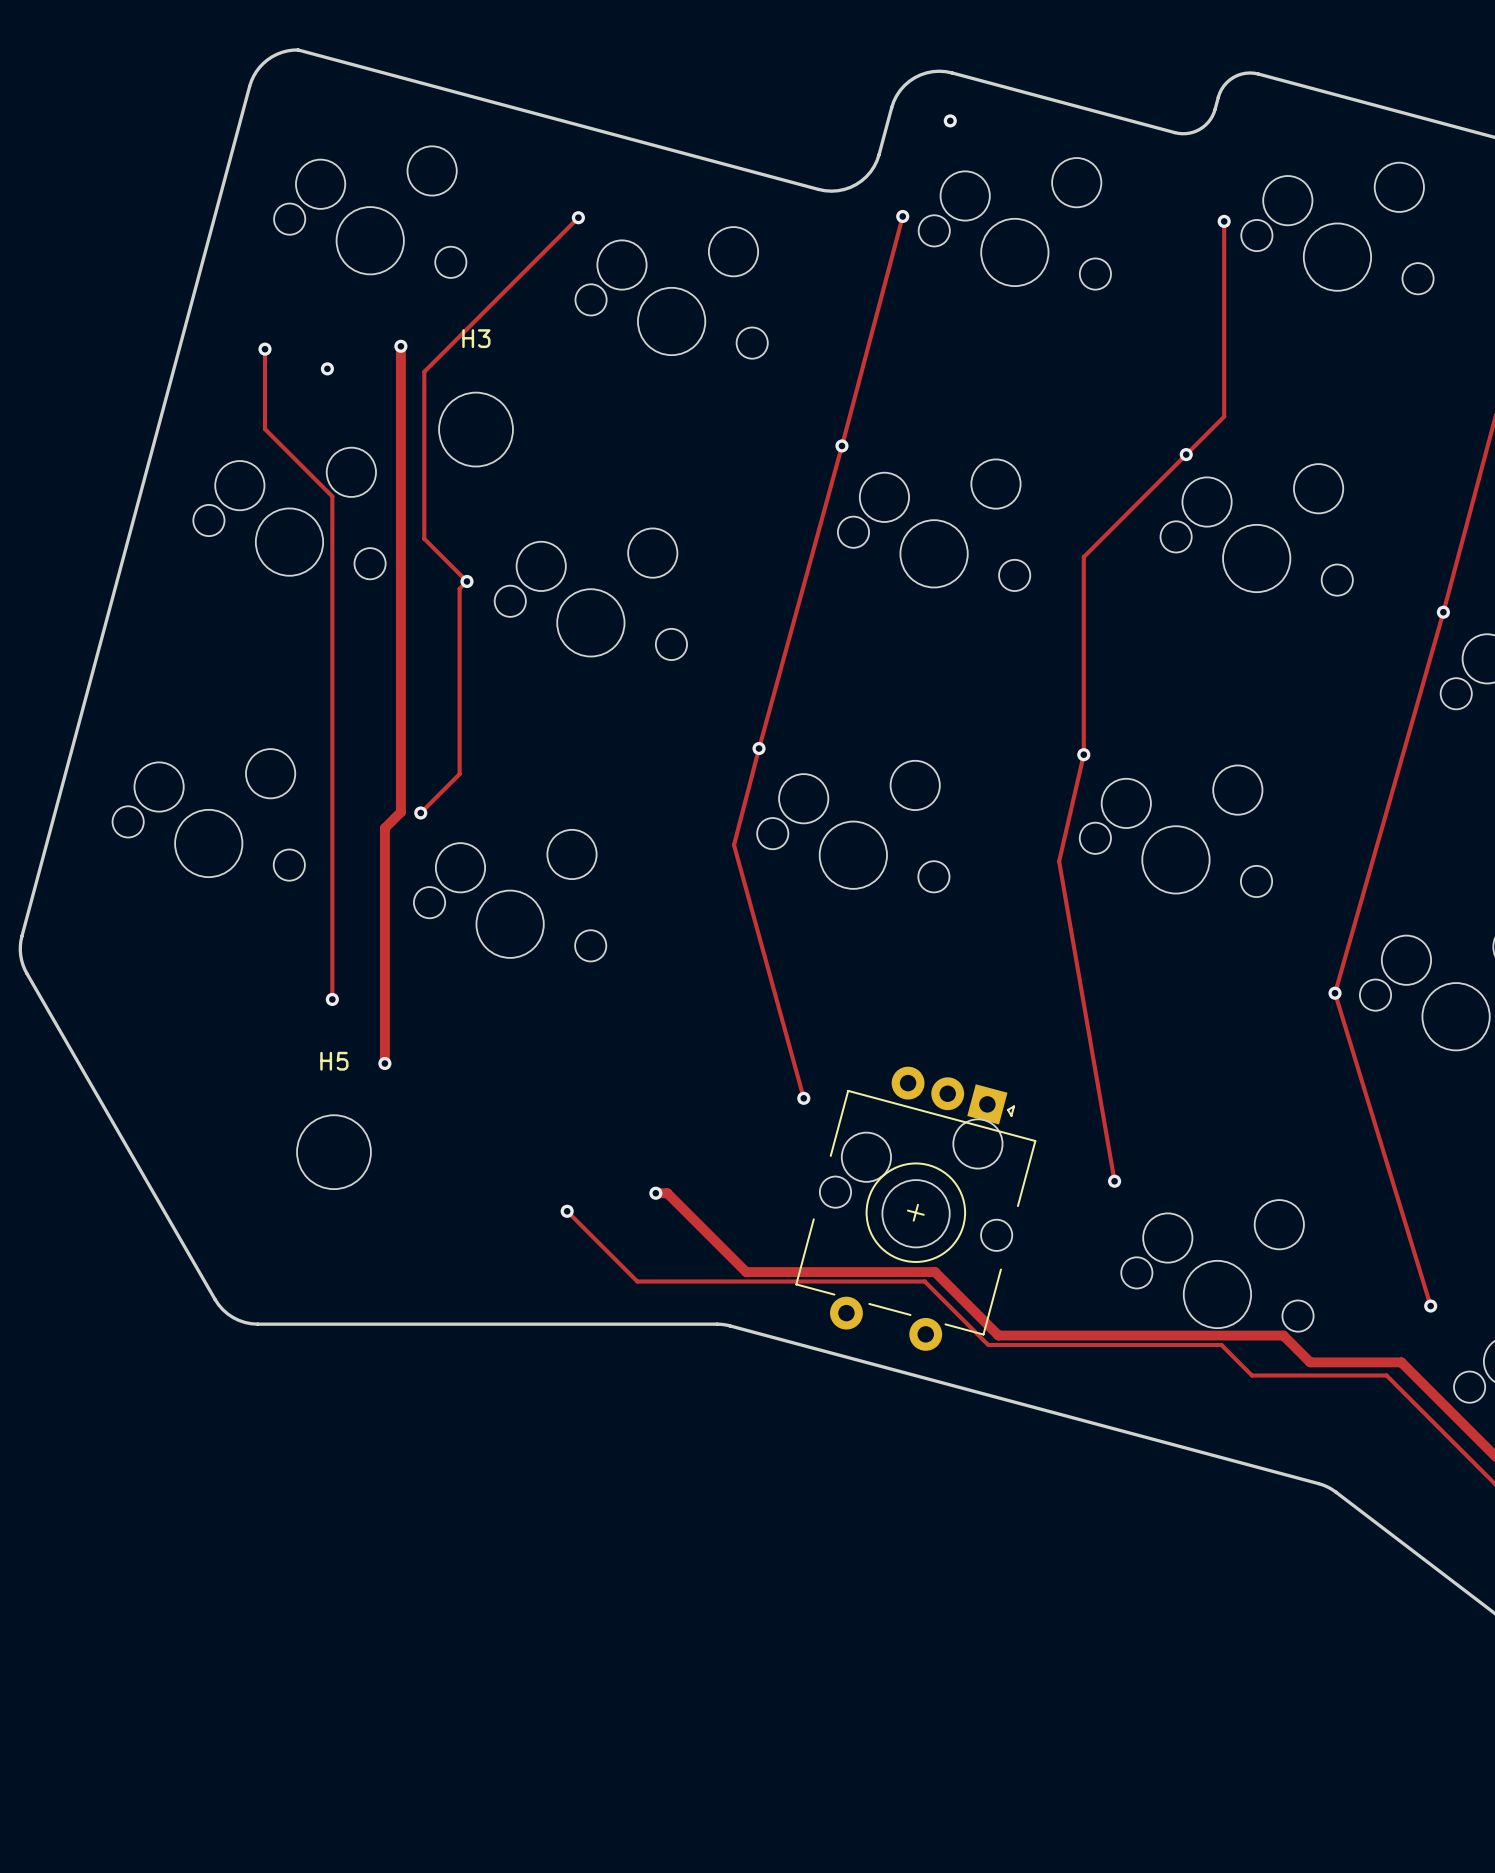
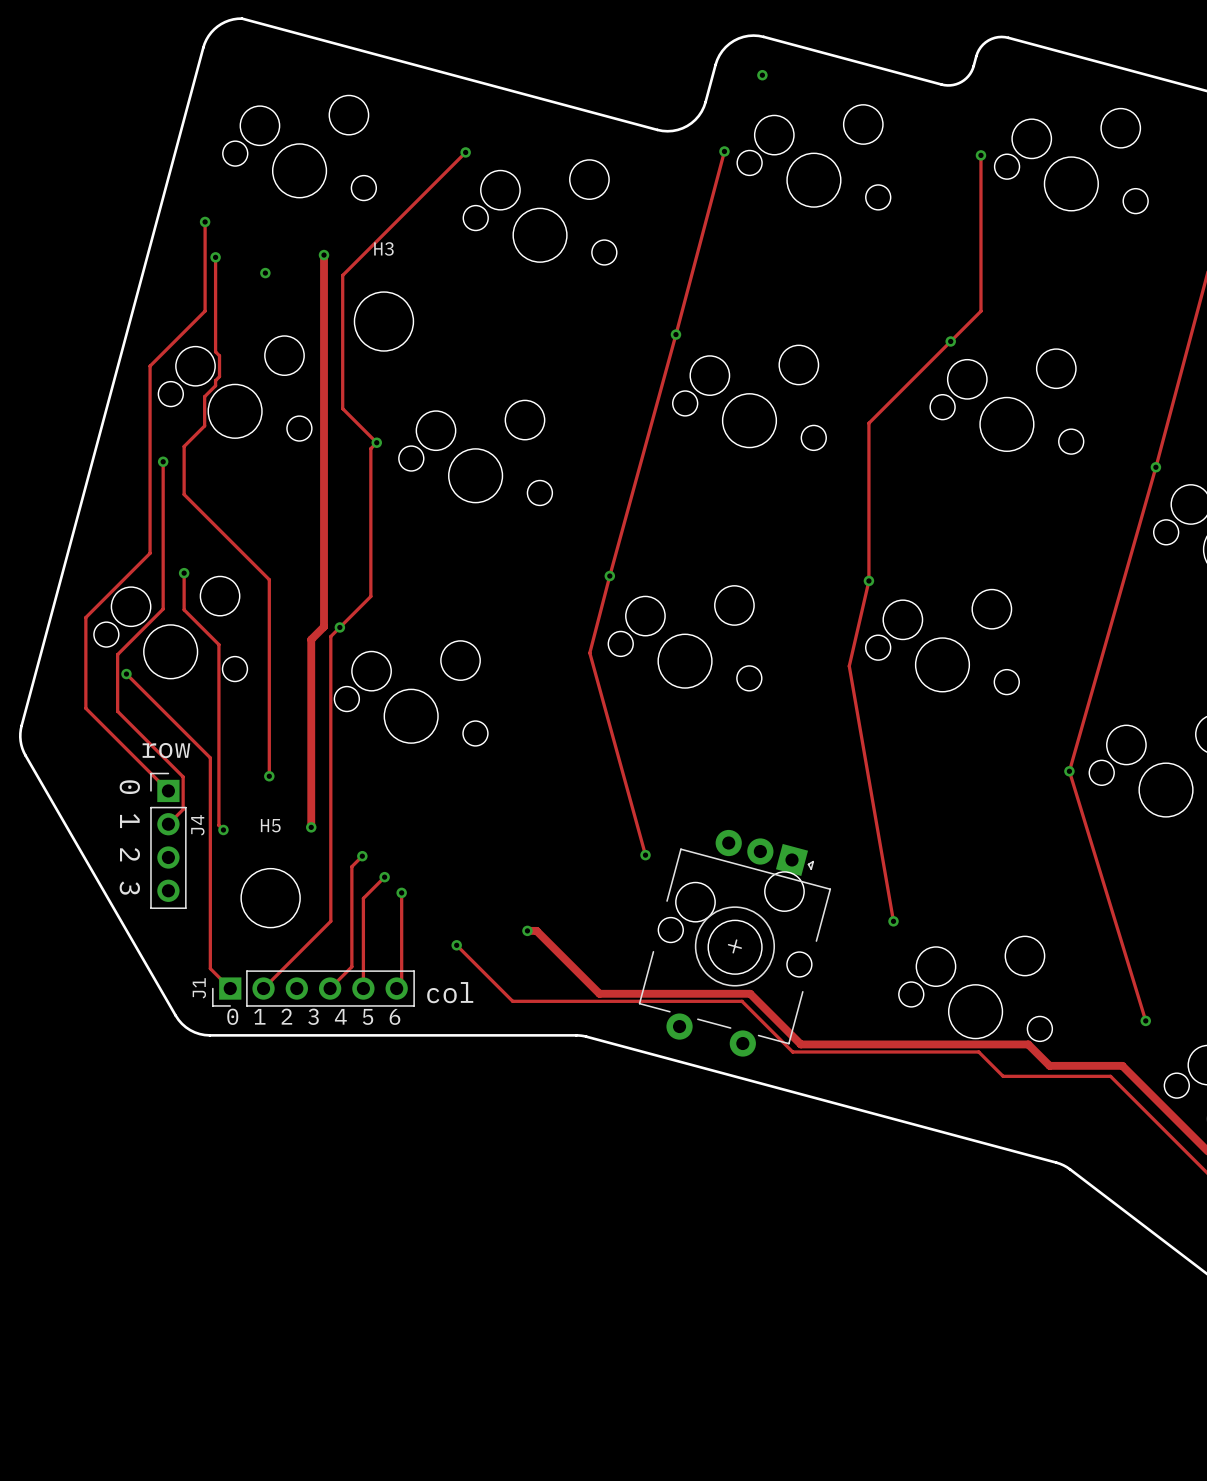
track: none -> (205, 221) (205, 311) (150, 366) (150, 553) (85, 617) (85, 708) (168, 790)
via: none -> (205, 221)
track: (265, 429) (332, 496) (332, 753) -> (215, 321) (215, 351) (219, 355) (219, 376) (215, 380) (215, 385) (204, 396) (204, 425) (184, 446) (184, 494) (269, 579)
track: none -> (163, 461) (163, 609) (117, 654) (117, 711) (183, 776) (183, 809) (168, 824)
via: none -> (163, 461)
track: none -> (184, 573) (184, 609) (218, 644) (218, 825) (223, 829)
via: none -> (184, 573)
track: none -> (339, 627) (330, 636) (330, 921) (263, 988)
track: none -> (126, 674) (210, 757) (210, 968) (230, 988)
via: none -> (126, 674)
text: none -> row (166, 750)
via: none -> (223, 829)
text: none -> 0 1 2 3 (129, 837)
J4: none -> (168, 840)
track: none -> (362, 856) (351, 866) (351, 966) (330, 988)
via: none -> (362, 856)
track: none -> (384, 877) (363, 898) (363, 988)
via: none -> (384, 877)
track: none -> (401, 892) (401, 983) (396, 988)
via: none -> (401, 892)
J1: none -> (313, 988)
text: none -> col (450, 992)
text: none -> 0 1 2 3 4 5 6 (313, 1016)

